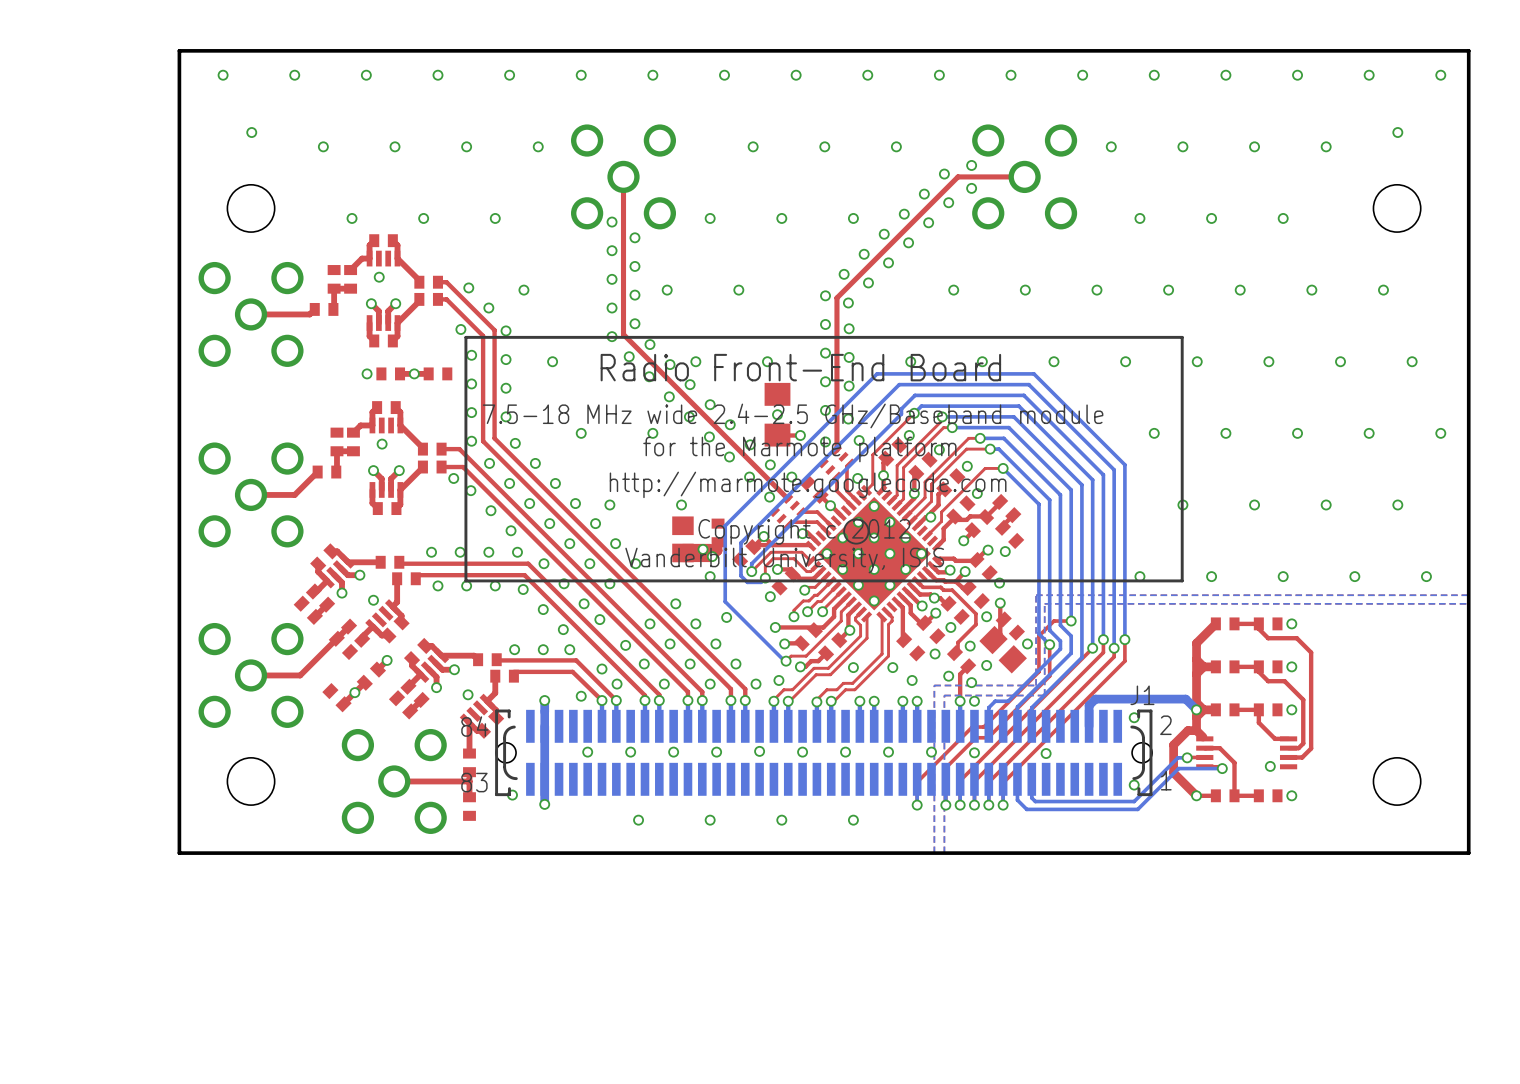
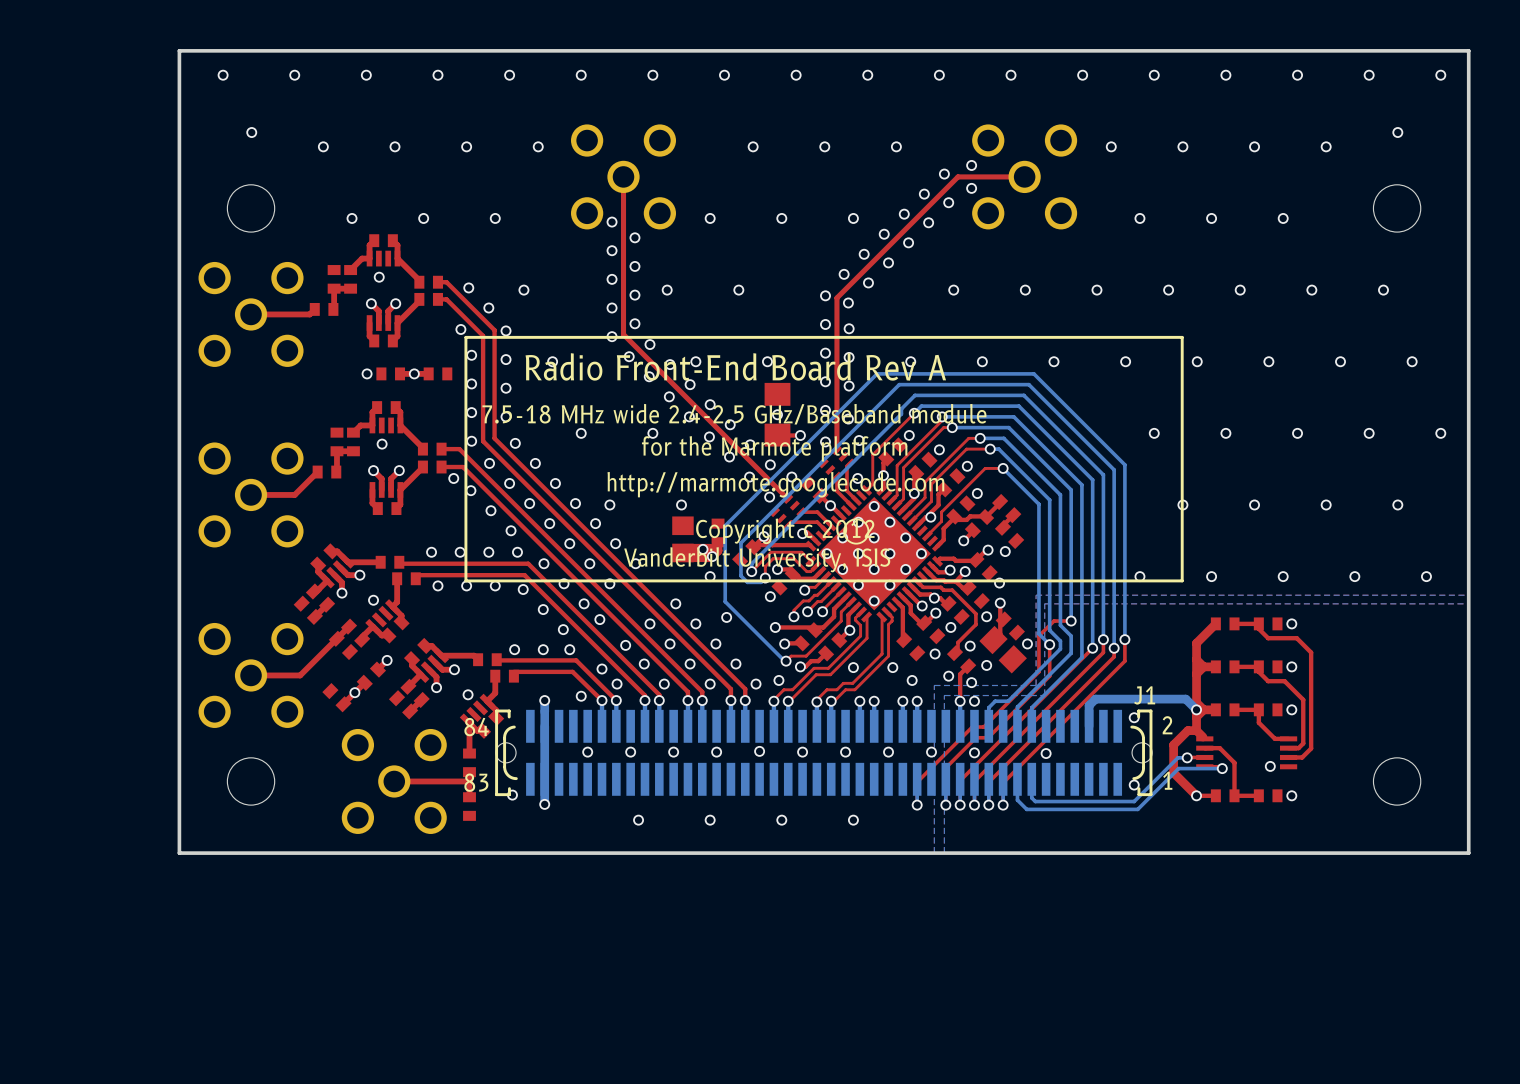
text: Radio Front-End Board (800, 367) -> Radio Front-End Board Rev A (735, 366)

